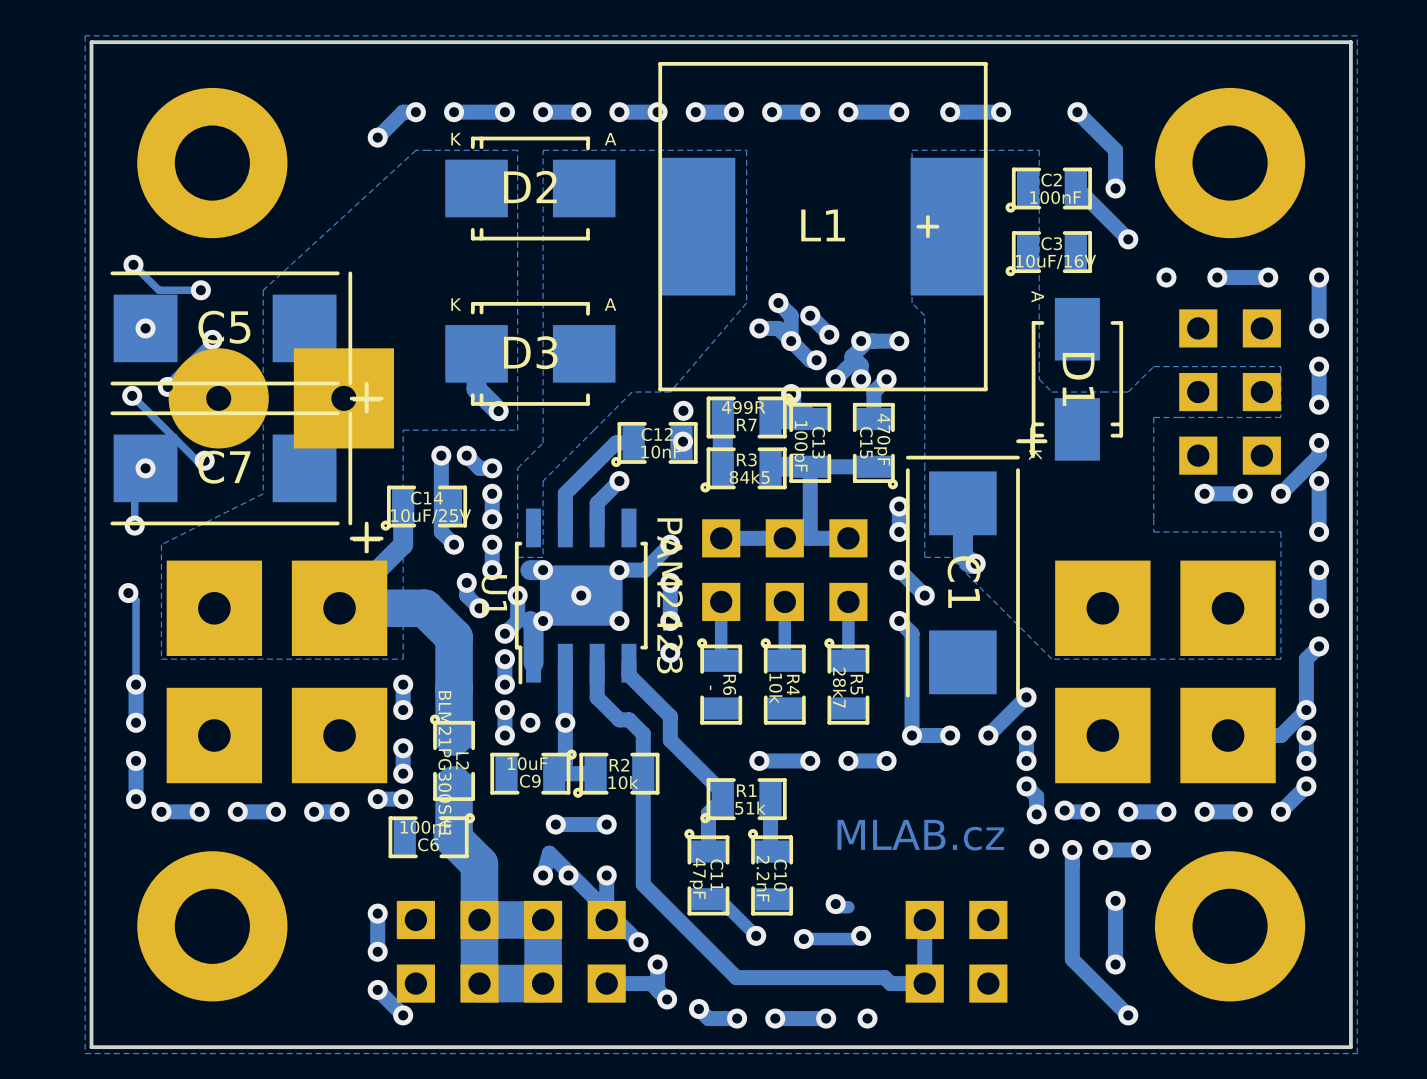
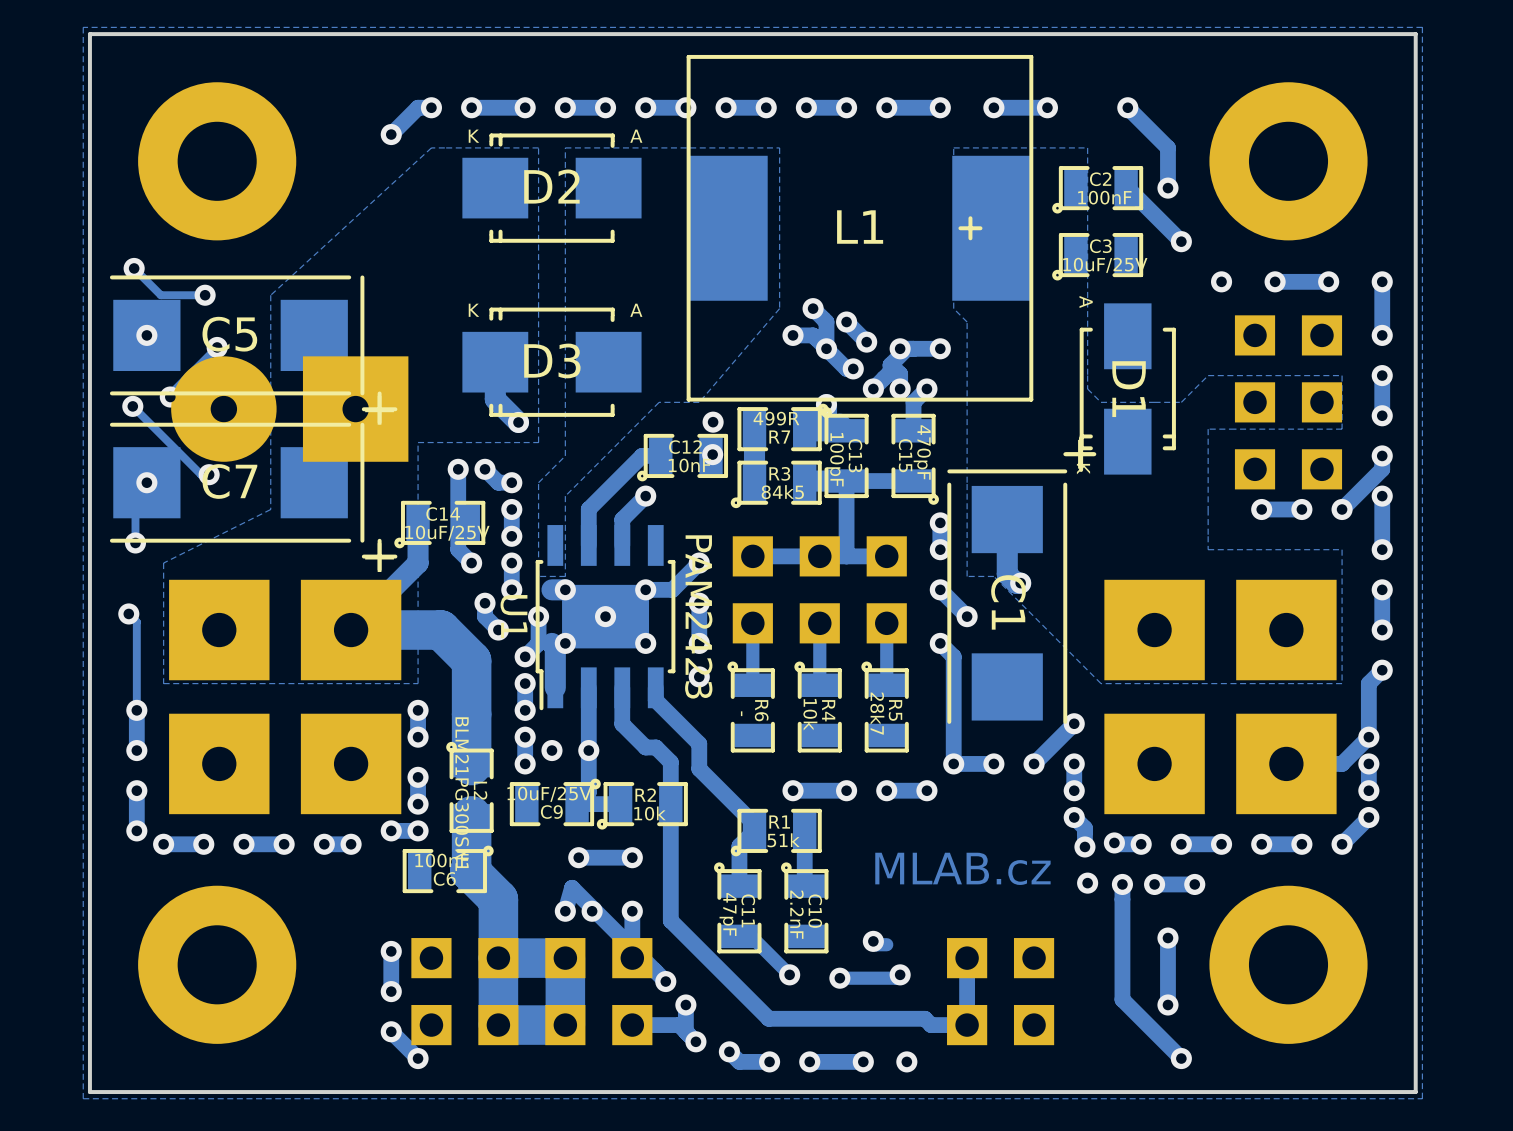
C3 value: 10uF/16V (1056, 261) -> 10uF/25V (1105, 265)
C9 value: 10uF (527, 763) -> 10uF/25V (549, 794)

